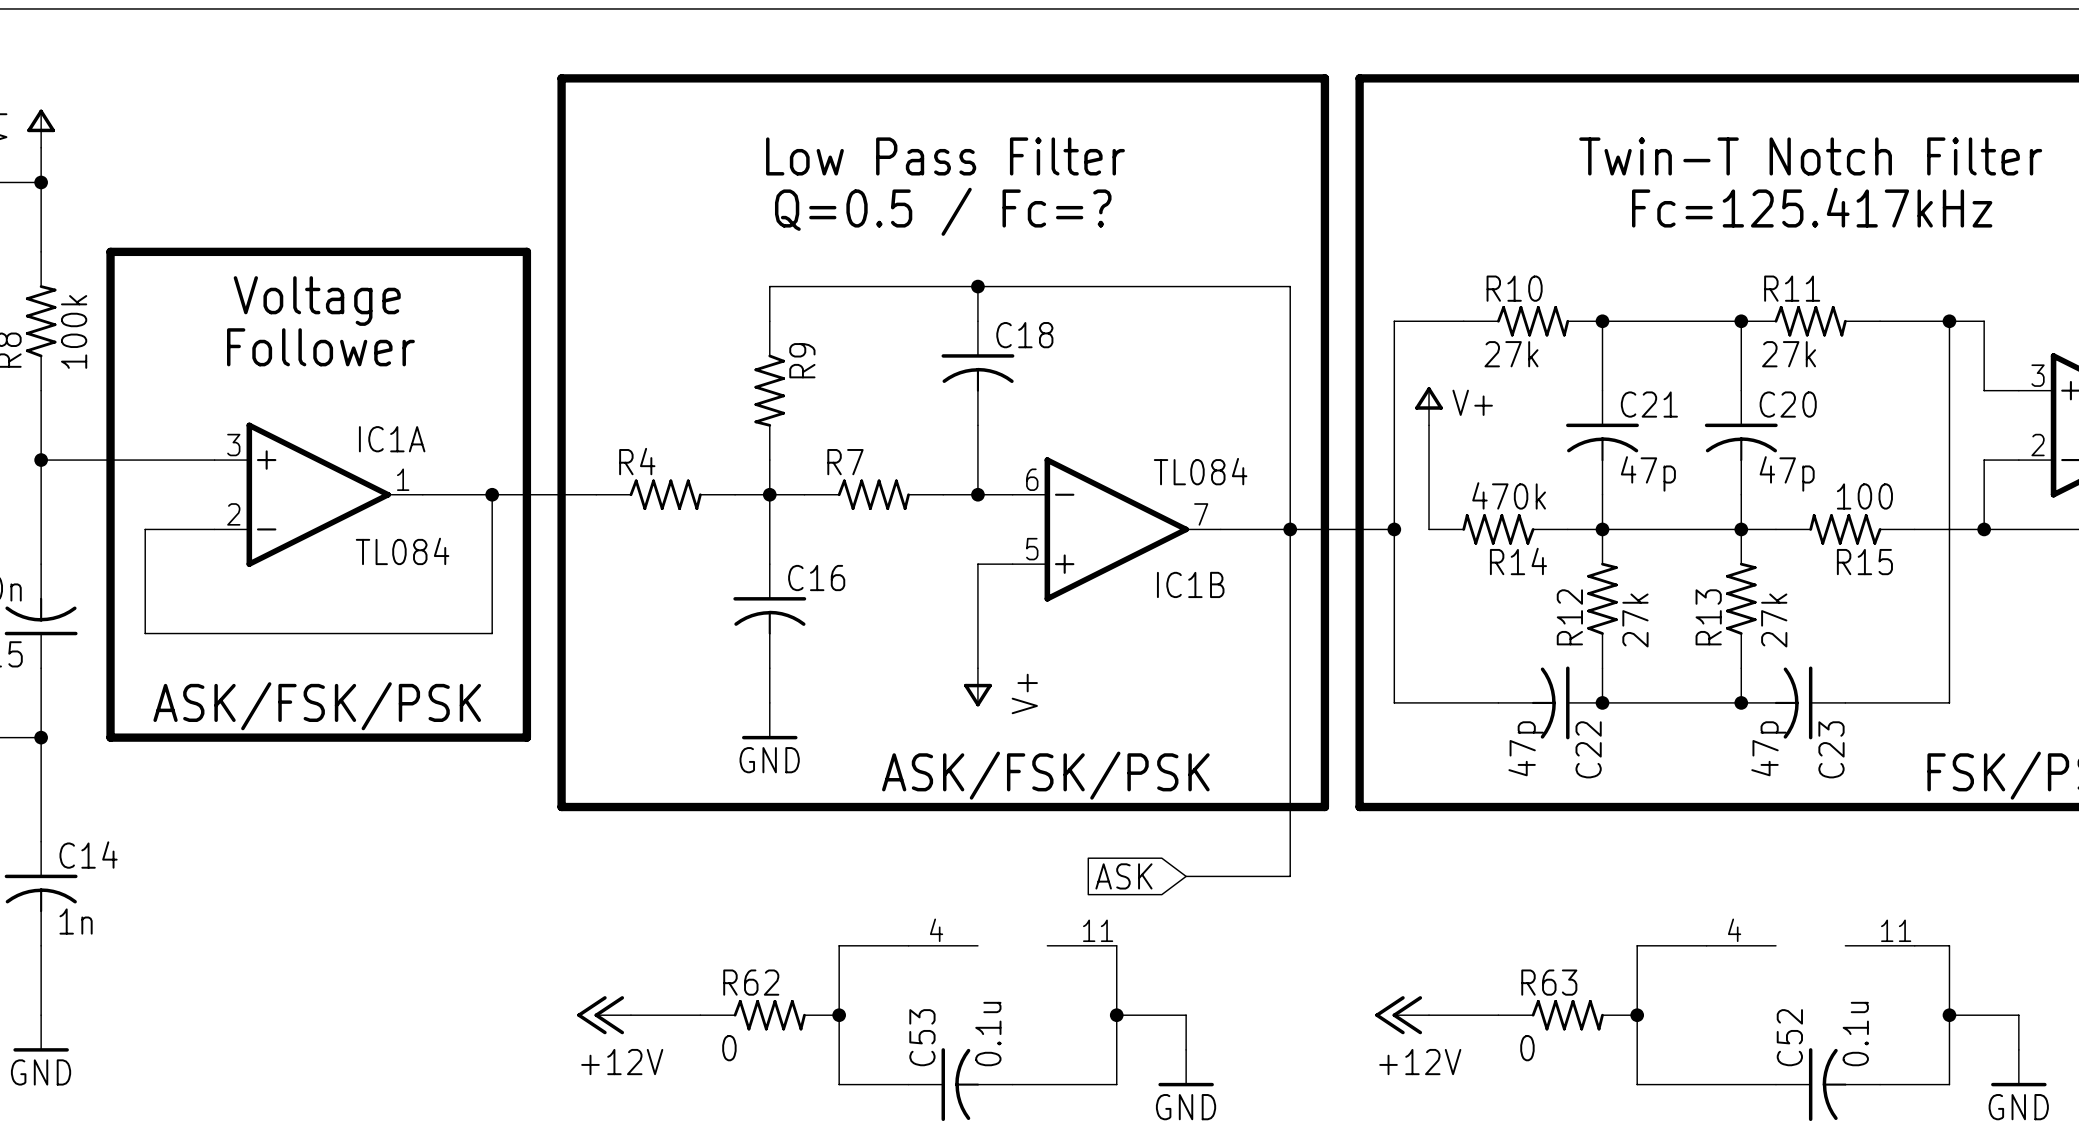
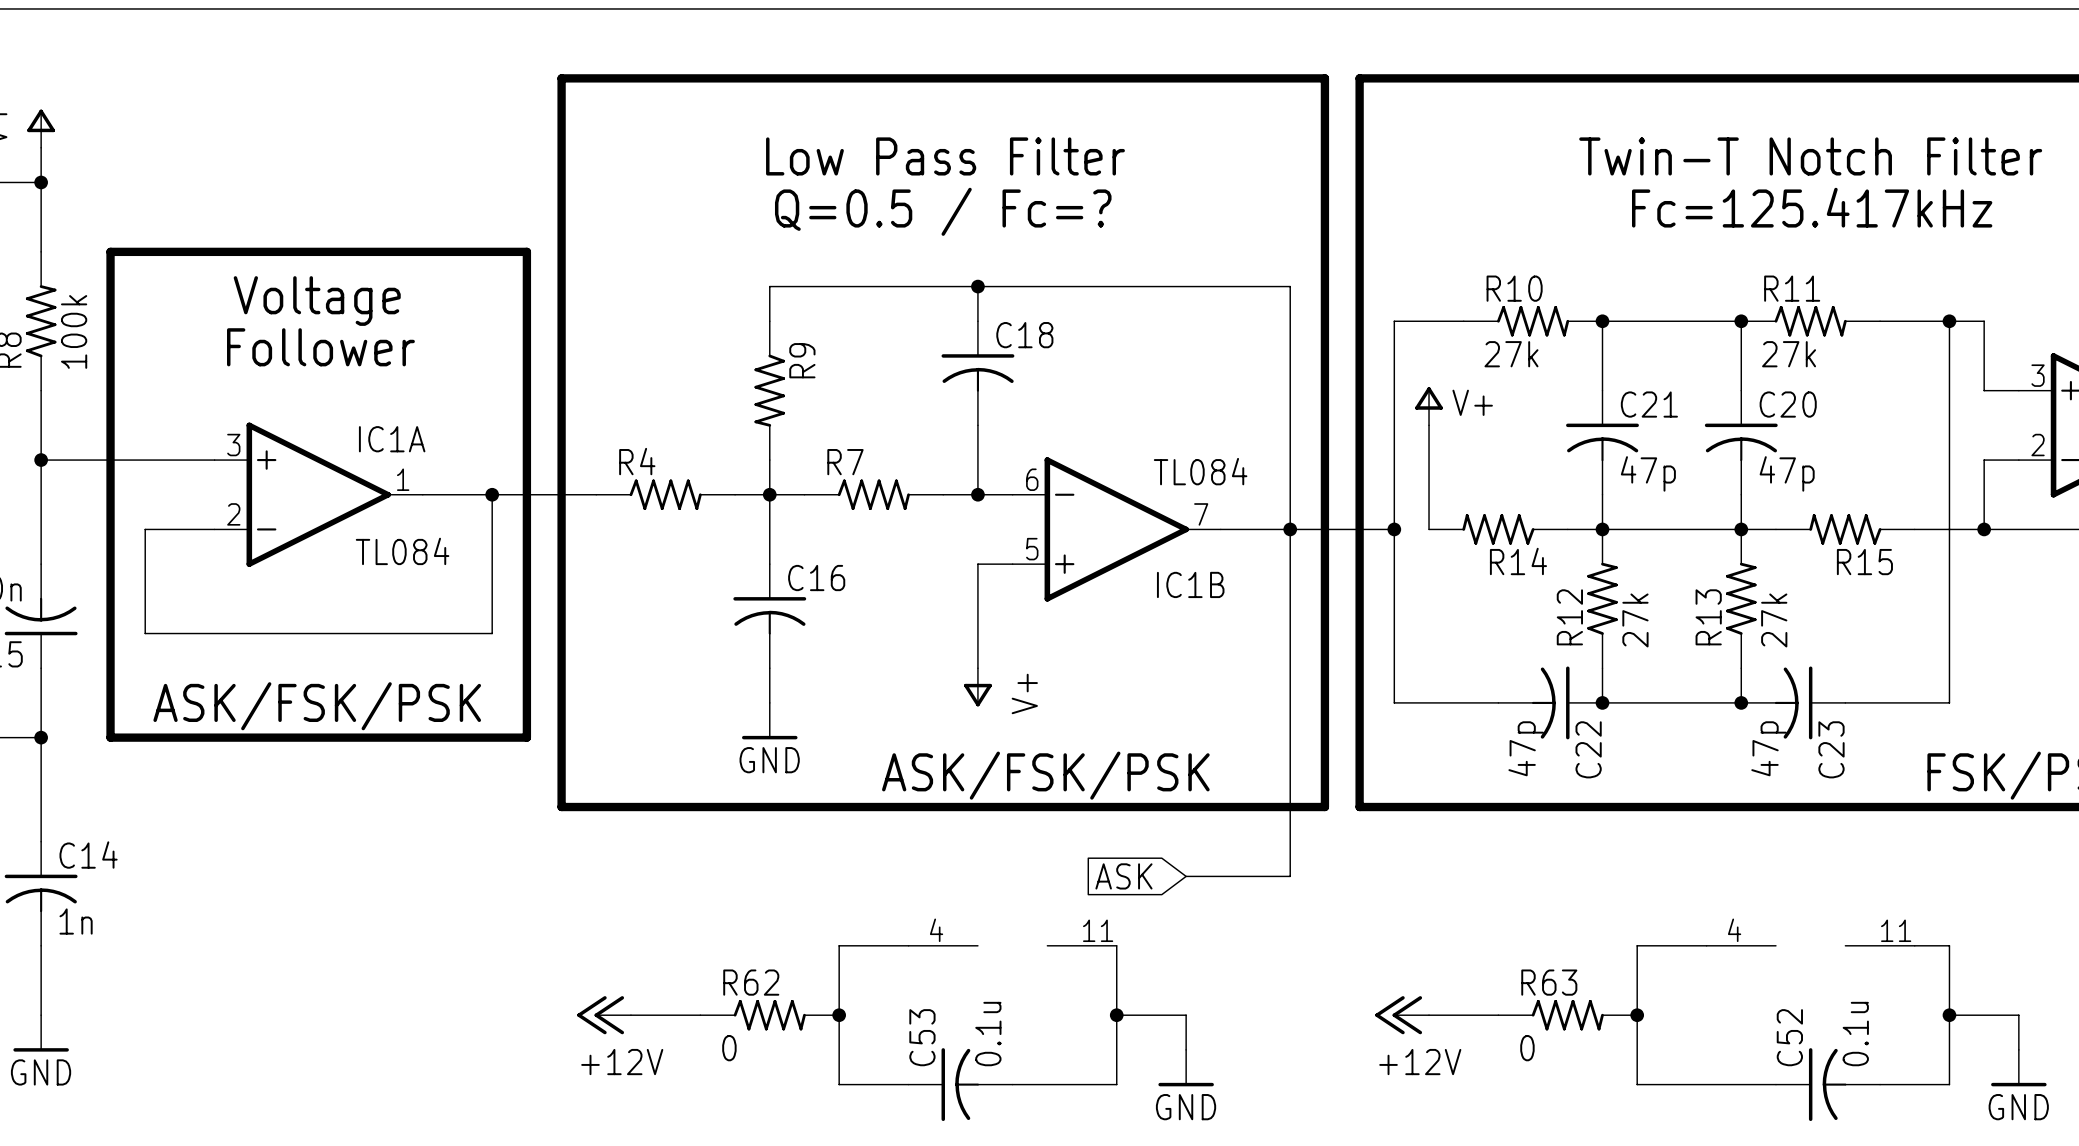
R14 value: 470k (1509, 495) -> none
R15 value: 100 (1864, 496) -> none

